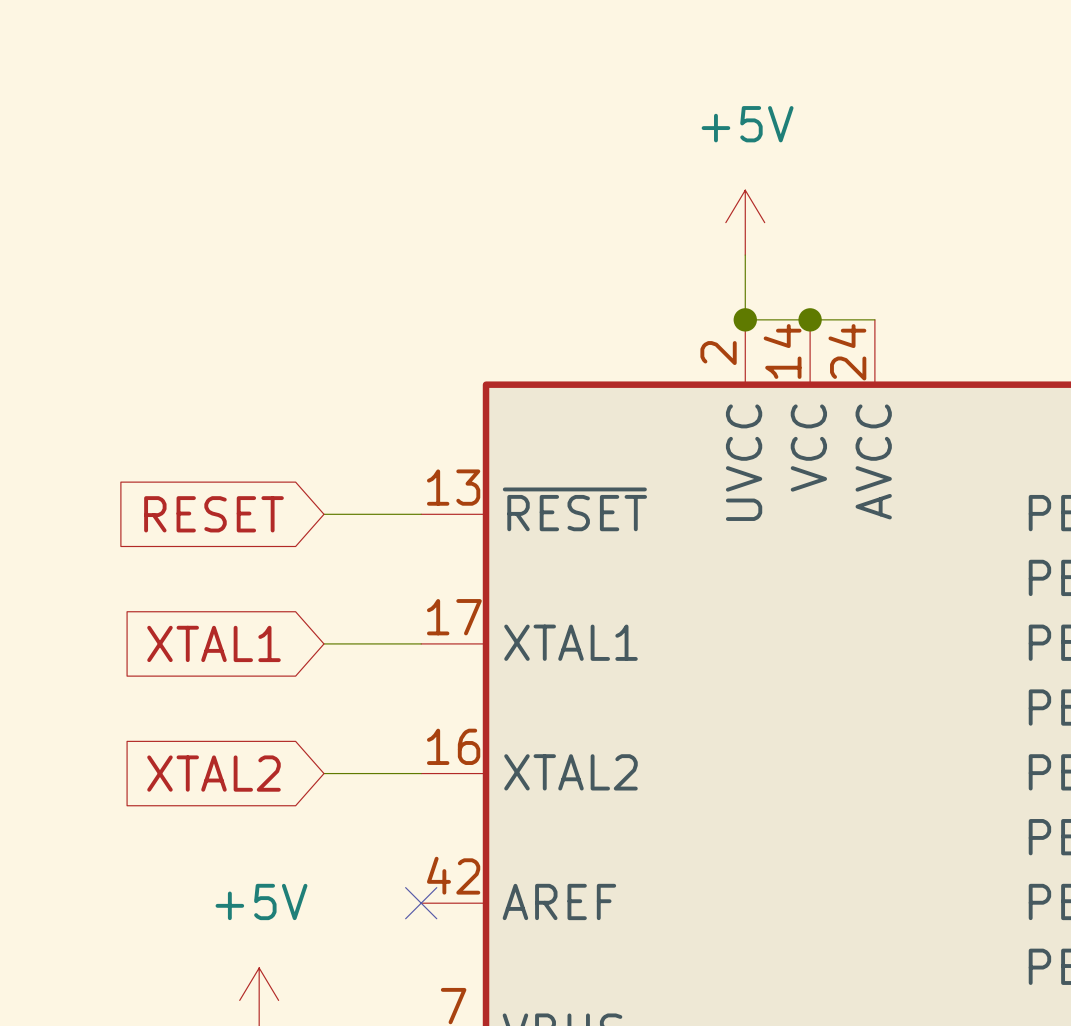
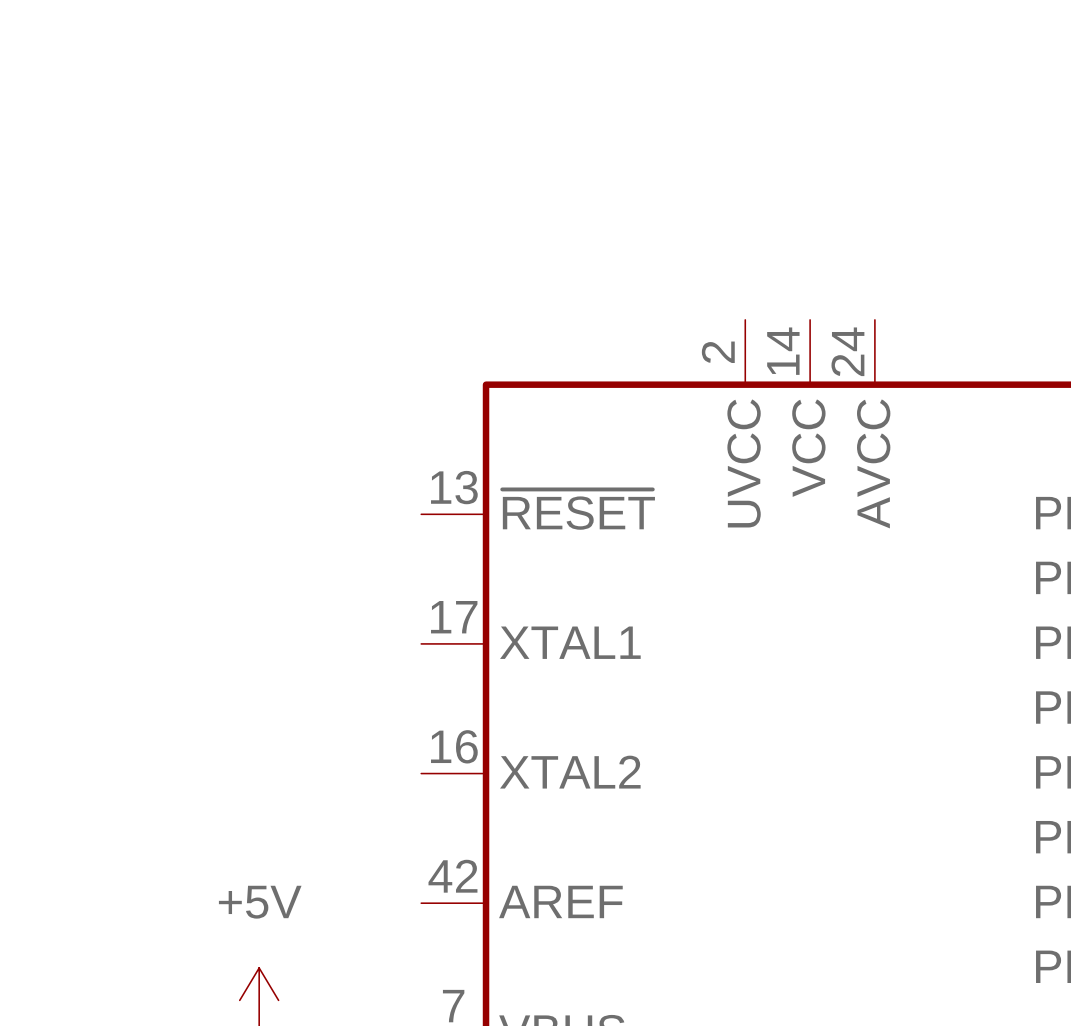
power symbol: +5V (745, 222) -> none
wire: (745, 255) (745, 319) (874, 319) -> none
junction: (745, 319) -> none
junction: (810, 319) -> none
global label: RESET (213, 514) -> none
wire: (323, 514) (421, 514) -> none
global label: XTAL1 (213, 643) -> none
wire: (323, 643) (421, 643) -> none
global label: XTAL2 (213, 773) -> none
wire: (323, 773) (421, 773) -> none
no-connect mark: (421, 903) -> none

